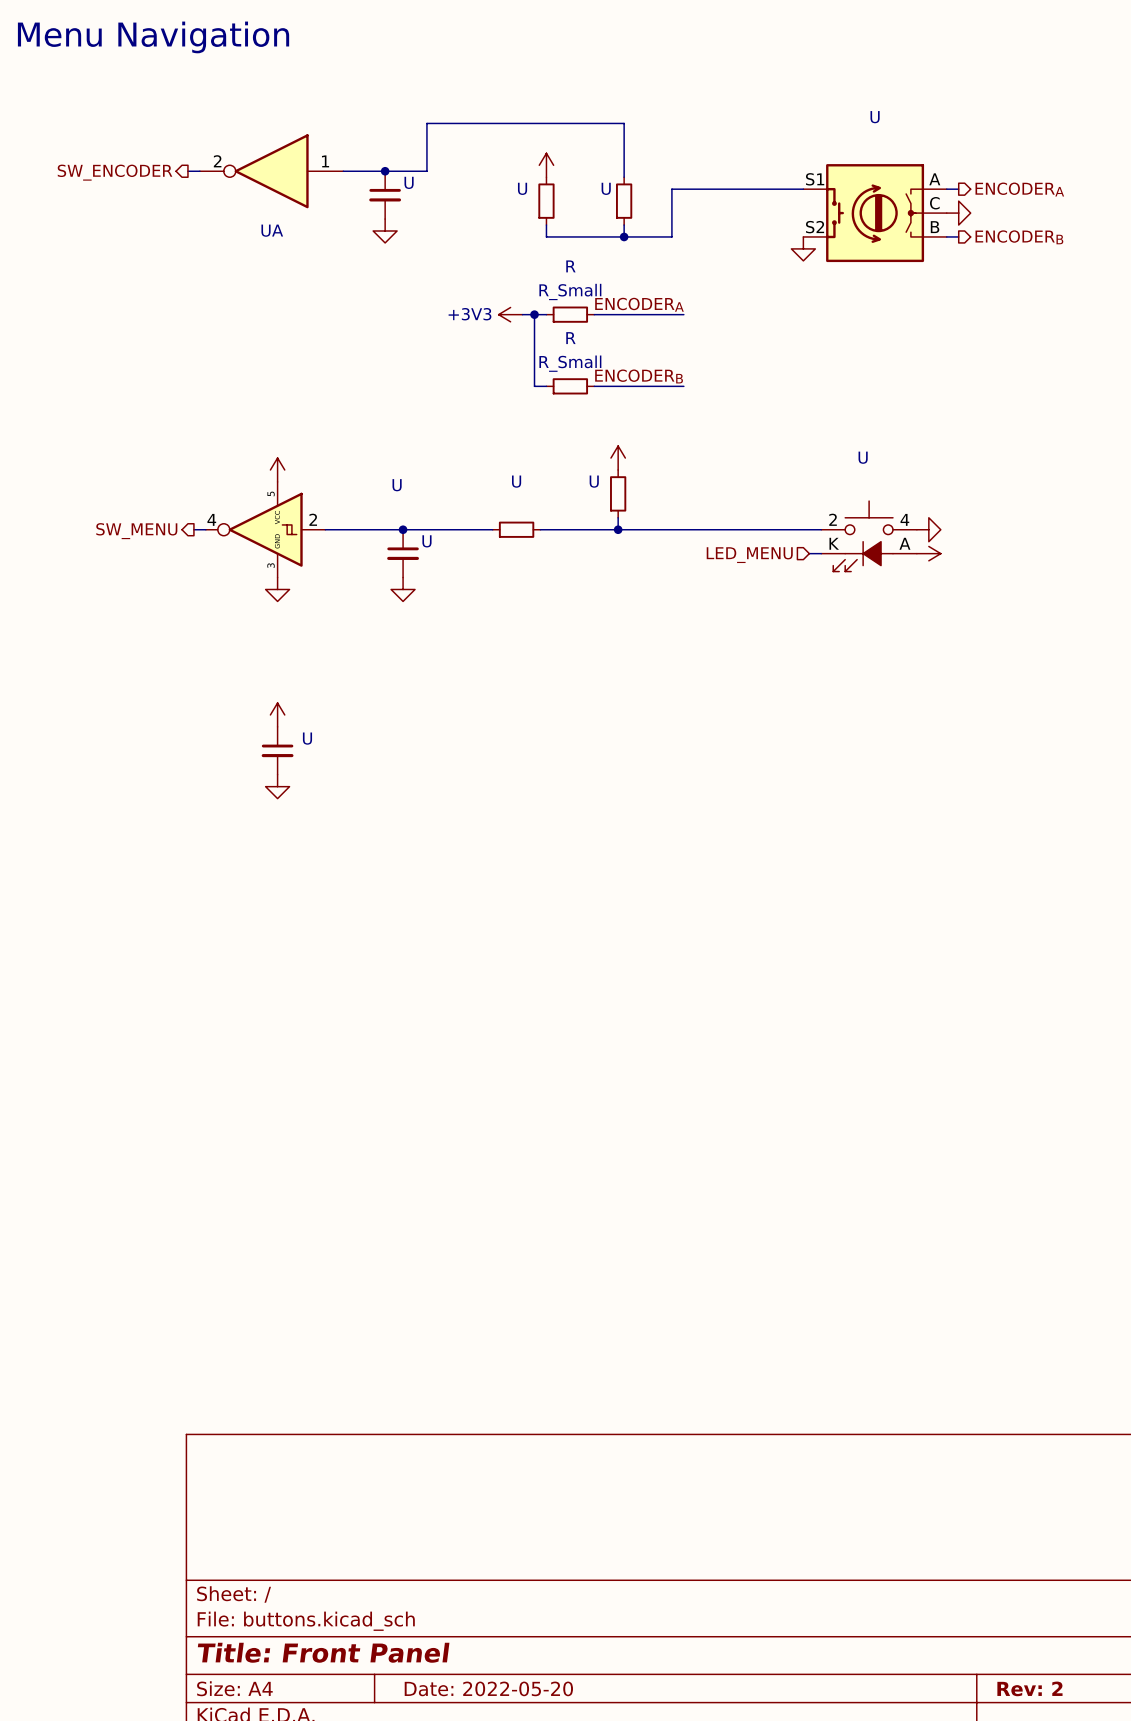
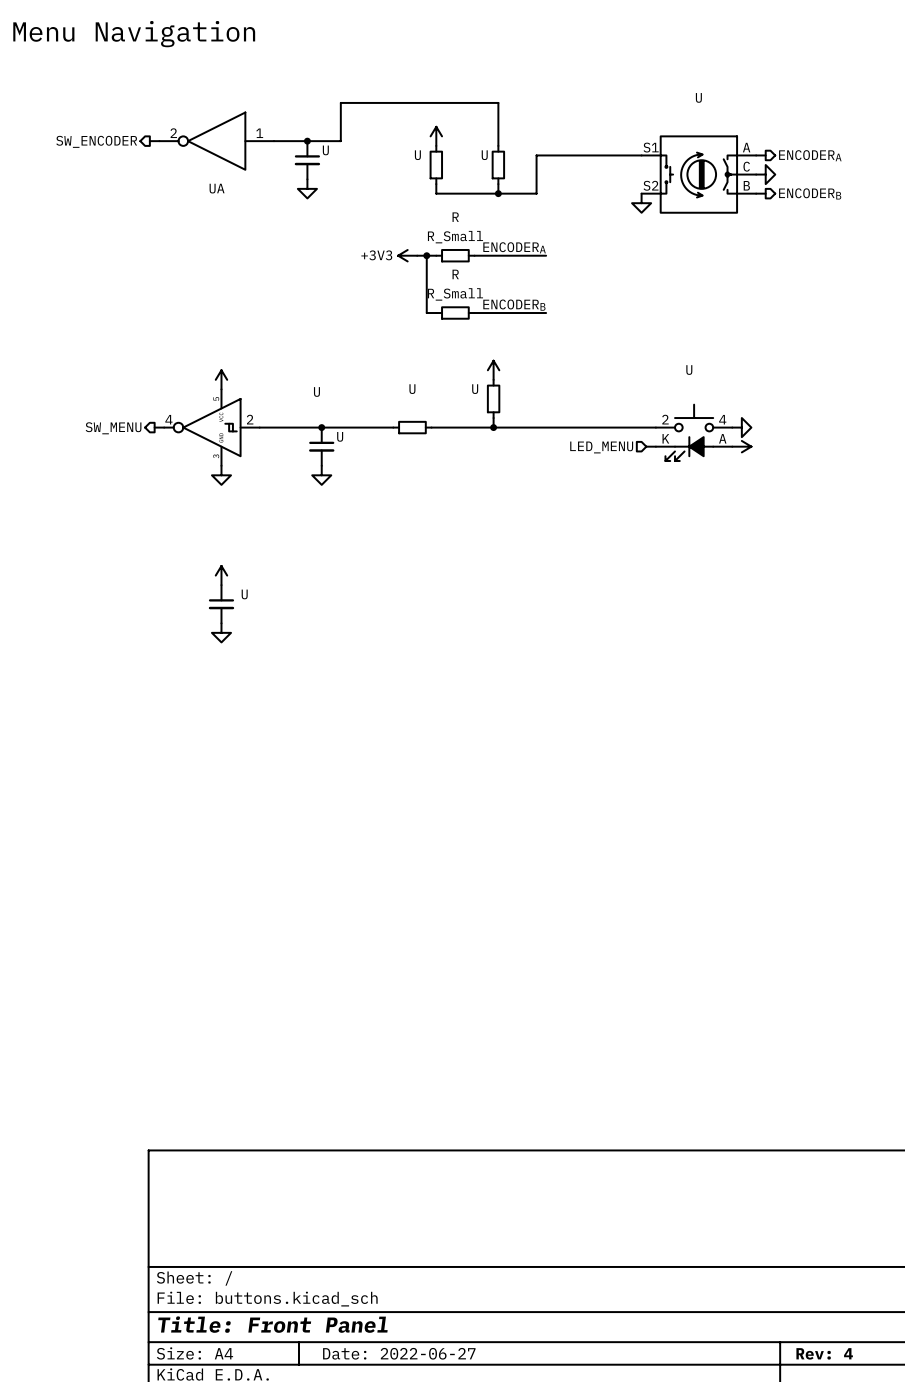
title block: Date: 2022-05-20 (488, 1688) -> Date: 2022-06-27 (399, 1353)
title block: Rev: 2 (1029, 1688) -> Rev: 4 (824, 1353)

